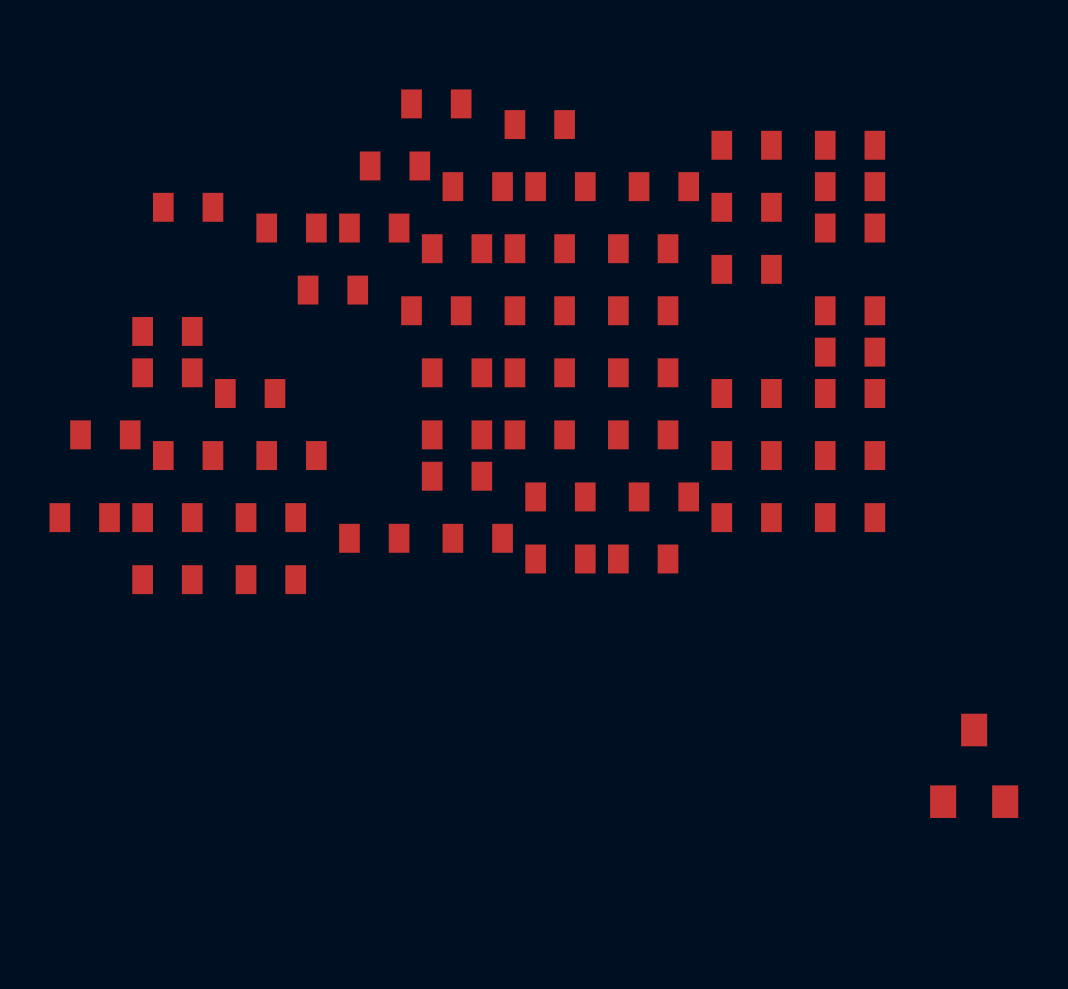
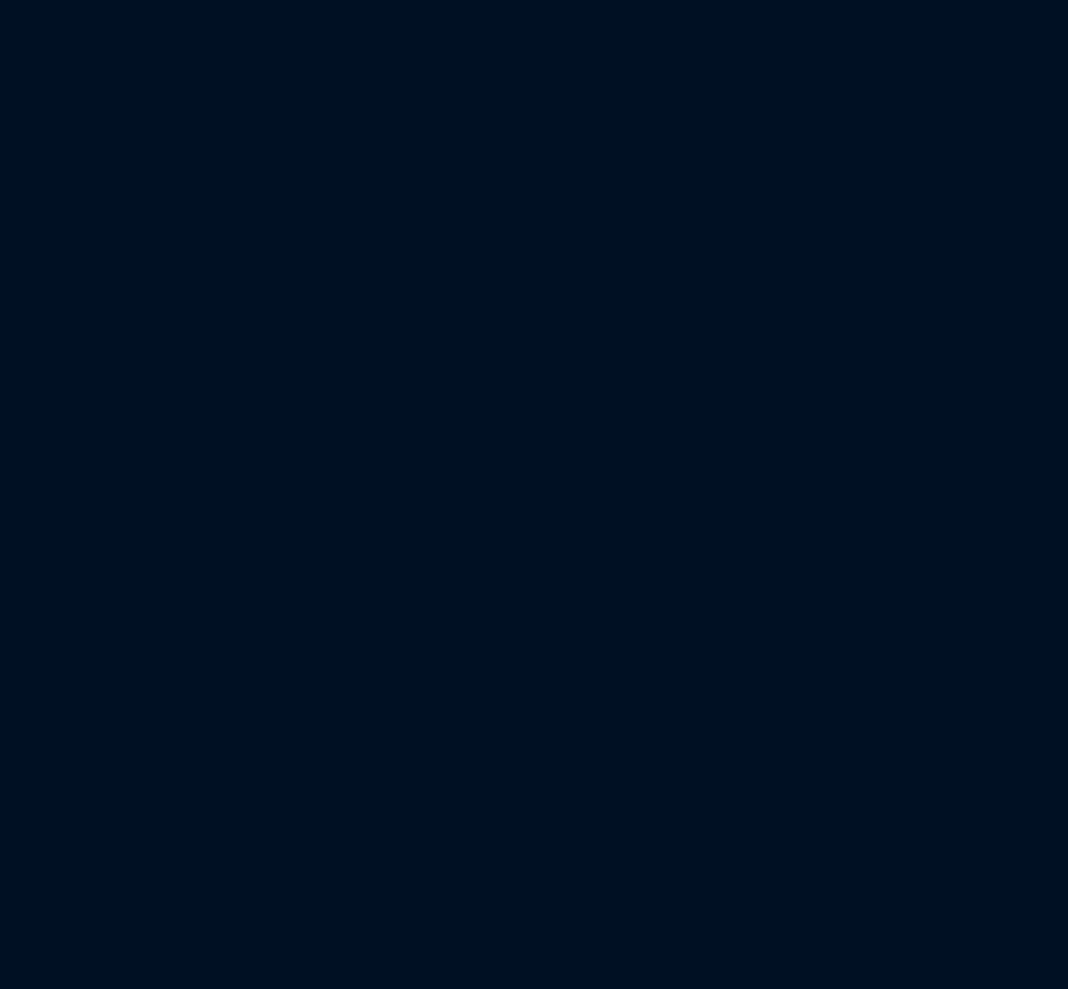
part: (436, 103) -> none
part: (539, 124) -> none
part: (746, 145) -> none
part: (850, 145) -> none
part: (394, 165) -> none
part: (477, 186) -> none
part: (560, 186) -> none
part: (663, 186) -> none
part: (850, 186) -> none
part: (188, 207) -> none
part: (746, 207) -> none
part: (291, 228) -> none
part: (374, 228) -> none
part: (850, 228) -> none
part: (457, 248) -> none
part: (539, 248) -> none
part: (643, 248) -> none
part: (746, 269) -> none
part: (332, 290) -> none
part: (436, 310) -> none
part: (539, 310) -> none
part: (643, 310) -> none
part: (850, 310) -> none
part: (167, 331) -> none
part: (850, 352) -> none
part: (167, 372) -> none
part: (457, 372) -> none
part: (539, 372) -> none
part: (643, 372) -> none
part: (250, 393) -> none
part: (746, 393) -> none
part: (850, 393) -> none
part: (105, 434) -> none
part: (457, 434) -> none
part: (539, 434) -> none
part: (643, 434) -> none
part: (188, 455) -> none
part: (291, 455) -> none
part: (746, 455) -> none
part: (850, 455) -> none
part: (457, 476) -> none
part: (560, 496) -> none
part: (663, 496) -> none
part: (84, 517) -> none
part: (167, 517) -> none
part: (270, 517) -> none
part: (746, 517) -> none
part: (850, 517) -> none
part: (374, 538) -> none
part: (477, 538) -> none
part: (560, 558) -> none
part: (643, 558) -> none
part: (167, 579) -> none
part: (270, 579) -> none
part: (974, 765) -> none

